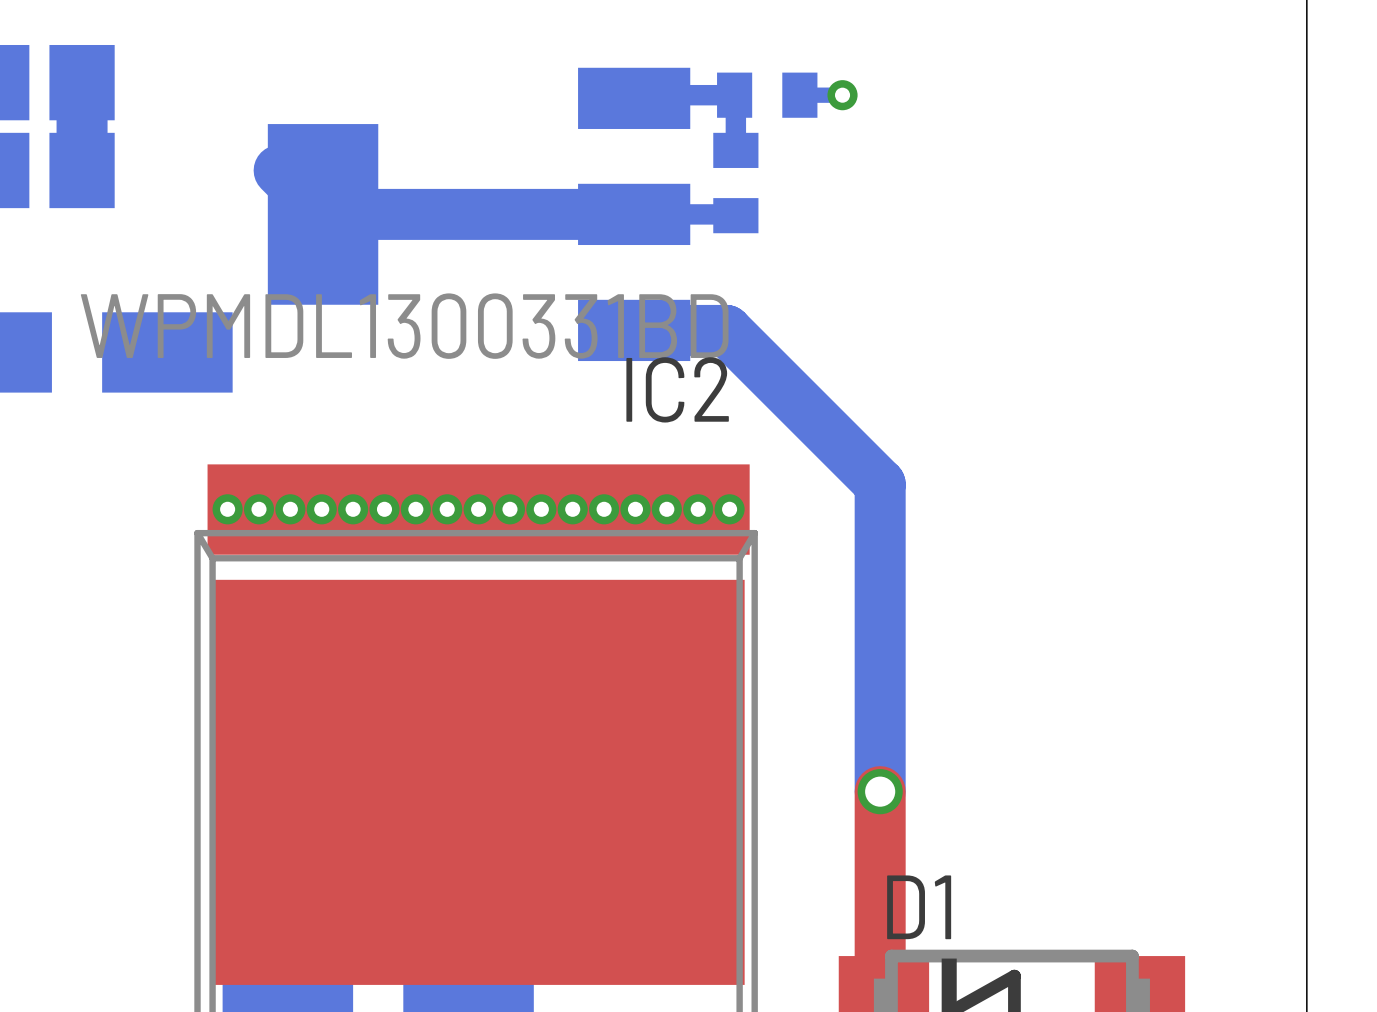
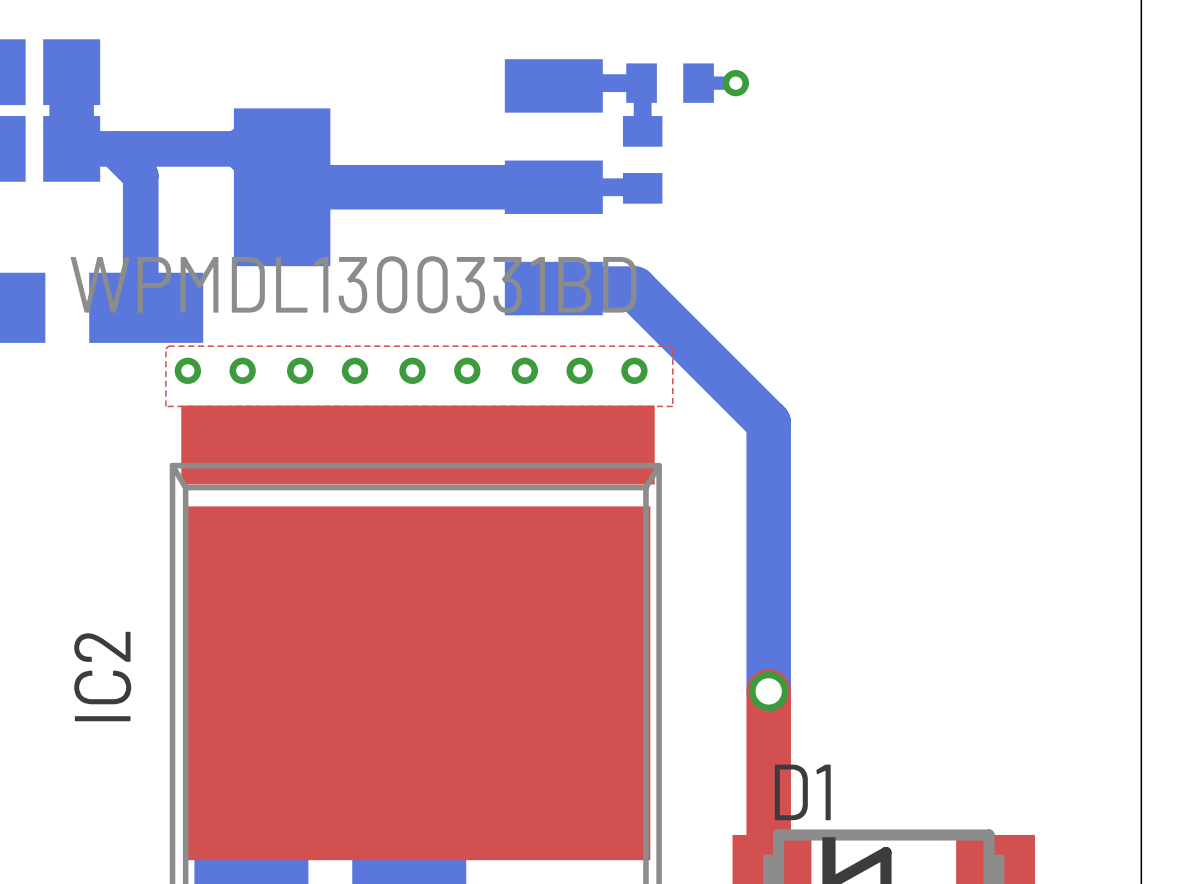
bottom track: none -> (71, 148) (243, 148)
bottom track: none -> (113, 148) (140, 175) (140, 302)
IC2 name rotation: 0° (677, 389) -> 90° counterclockwise (102, 676)
IC2 name position: IC2 (677, 389) -> IC2 (102, 676)
top zone outline: none -> (168, 346) (670, 346) (672, 348) (672, 406) (165, 406) (165, 348) (168, 346)
via: none -> (187, 370)
via: none -> (242, 370)
via: none -> (300, 370)
via: none -> (354, 370)
via: none -> (412, 370)
via: none -> (467, 370)
via: none -> (524, 370)
via: none -> (579, 370)
via: none -> (634, 370)
via: (227, 509) -> none
via: (259, 509) -> none
via: (290, 509) -> none
via: (321, 509) -> none
via: (353, 509) -> none
via: (384, 509) -> none
via: (415, 509) -> none
via: (447, 509) -> none
via: (478, 509) -> none
via: (509, 509) -> none
via: (541, 509) -> none
via: (572, 509) -> none
via: (604, 509) -> none
via: (635, 509) -> none
via: (666, 509) -> none
via: (698, 509) -> none
via: (729, 509) -> none

